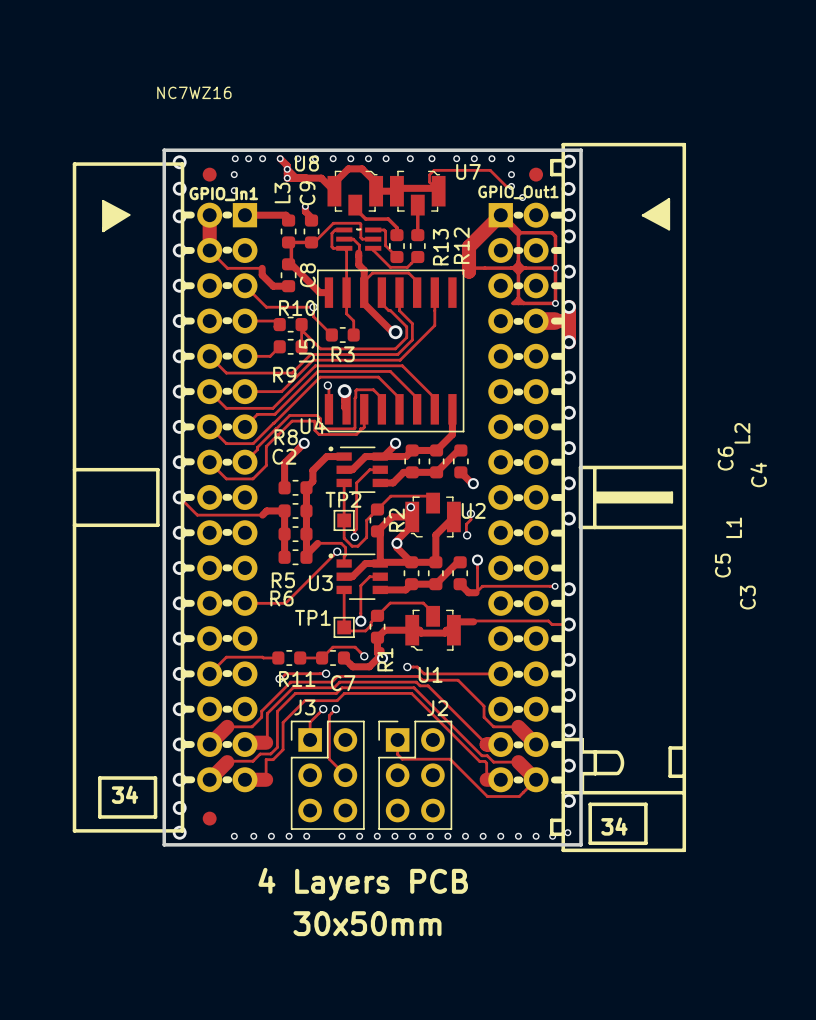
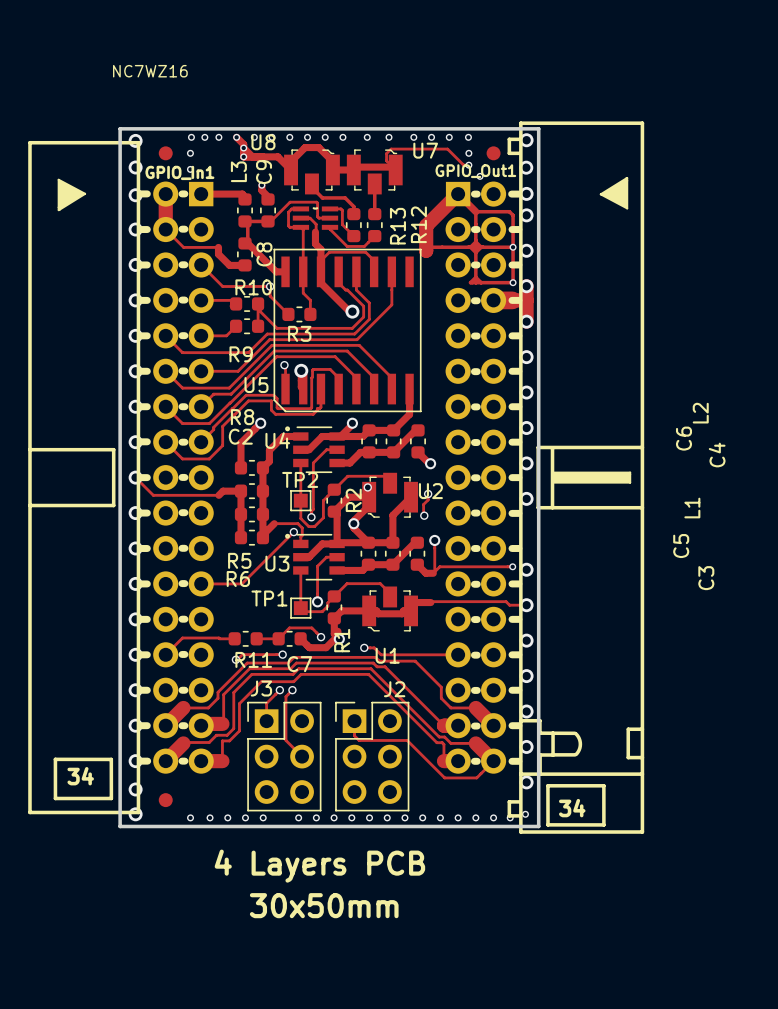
U5 name rotation: 0° (306, 350) -> 90° clockwise (256, 385)
U5 name position: U5 (306, 350) -> U5 (256, 385)
U4 name position: U4 (312, 425) -> U4 (277, 440)

